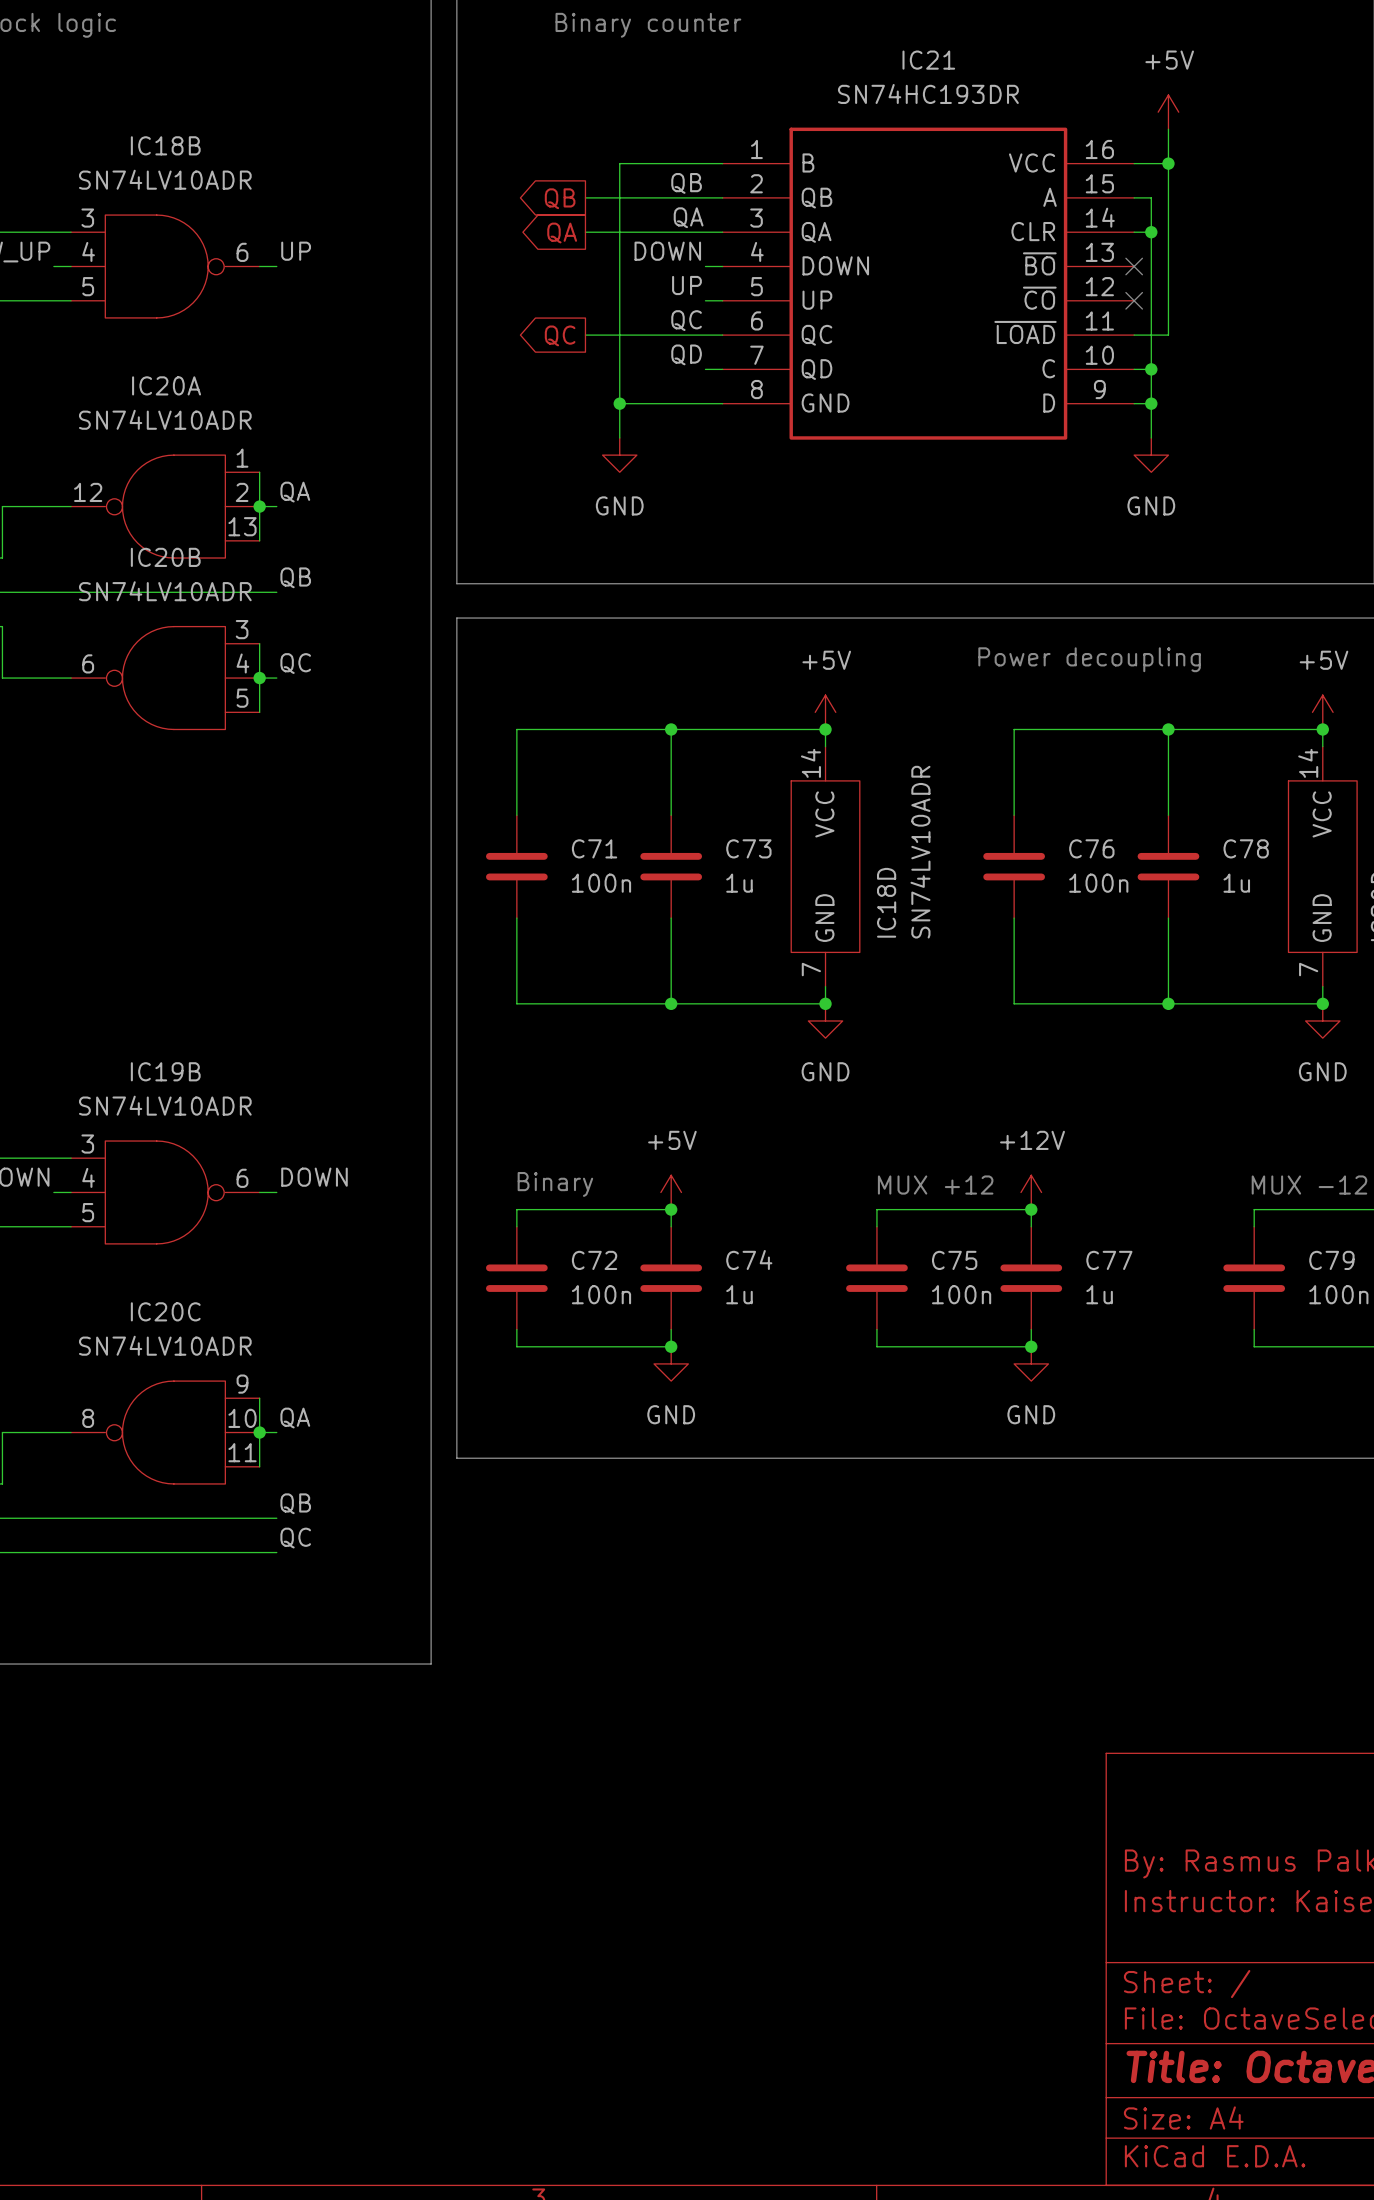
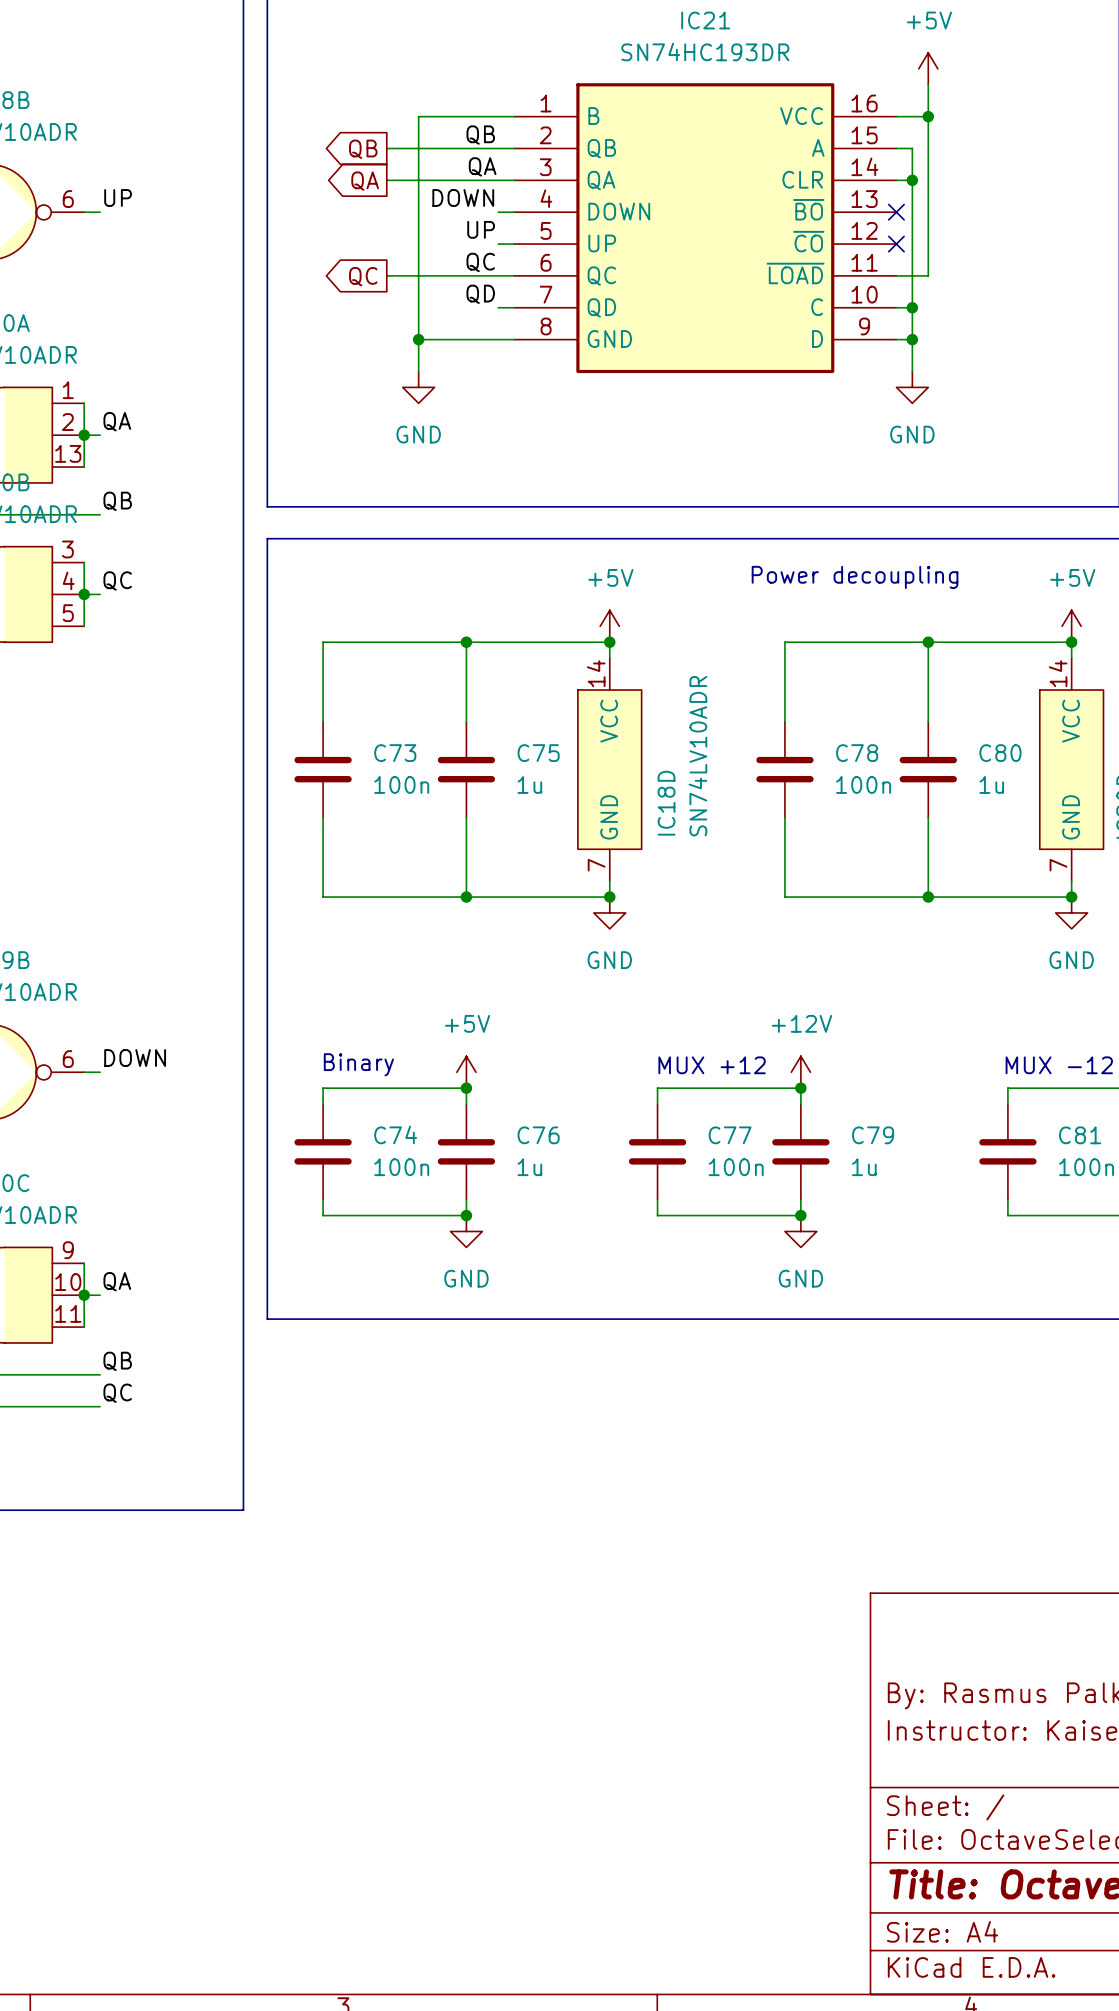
C71 name: C71 (594, 848) -> C73 (395, 753)
C73 name: C73 (748, 848) -> C75 (538, 753)
C76 name: C76 (1091, 848) -> C78 (857, 753)
C78 name: C78 (1246, 848) -> C80 (1000, 753)
C72 name: C72 (594, 1260) -> C74 (395, 1134)
C74 name: C74 (749, 1260) -> C76 (538, 1135)
C75 name: C75 (954, 1260) -> C77 (730, 1135)
C77 name: C77 (1109, 1260) -> C79 (873, 1135)
C79 name: C79 (1331, 1260) -> C81 (1080, 1135)

